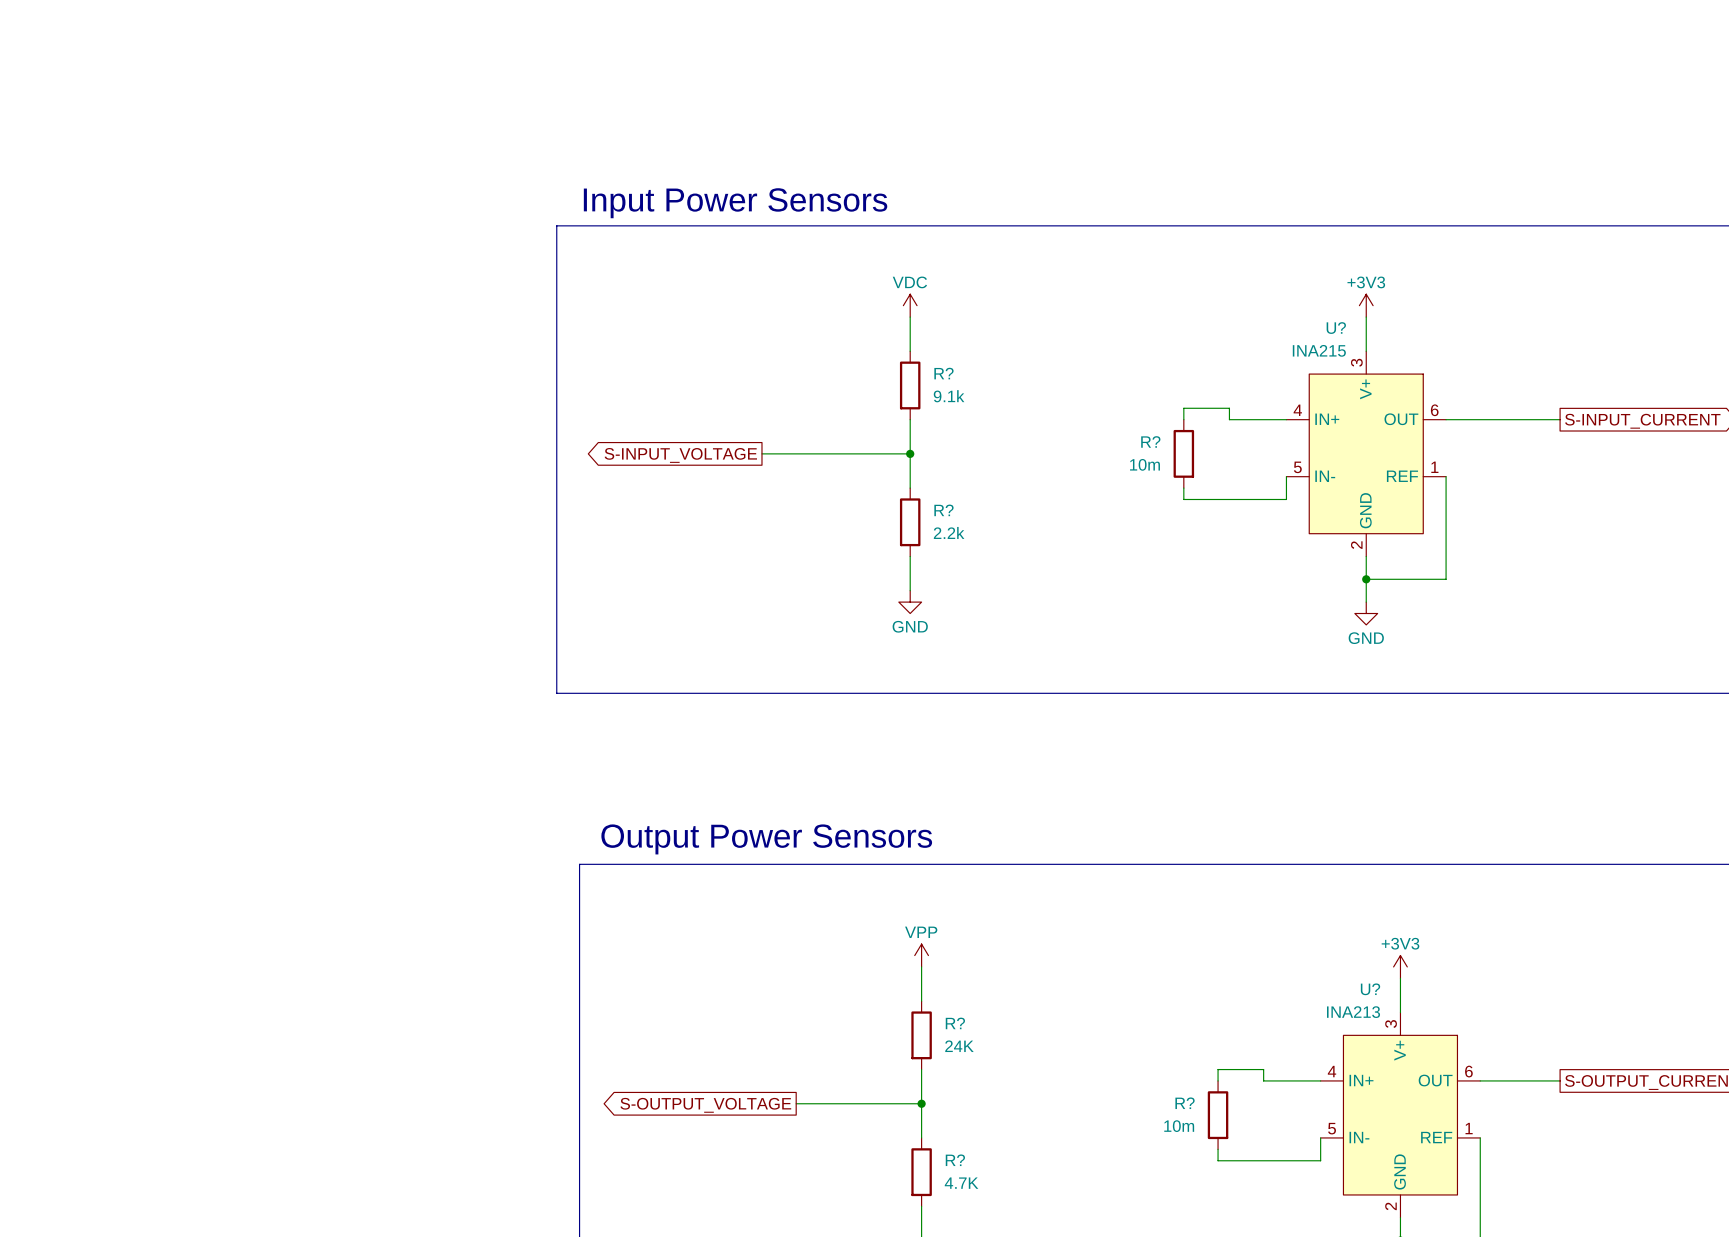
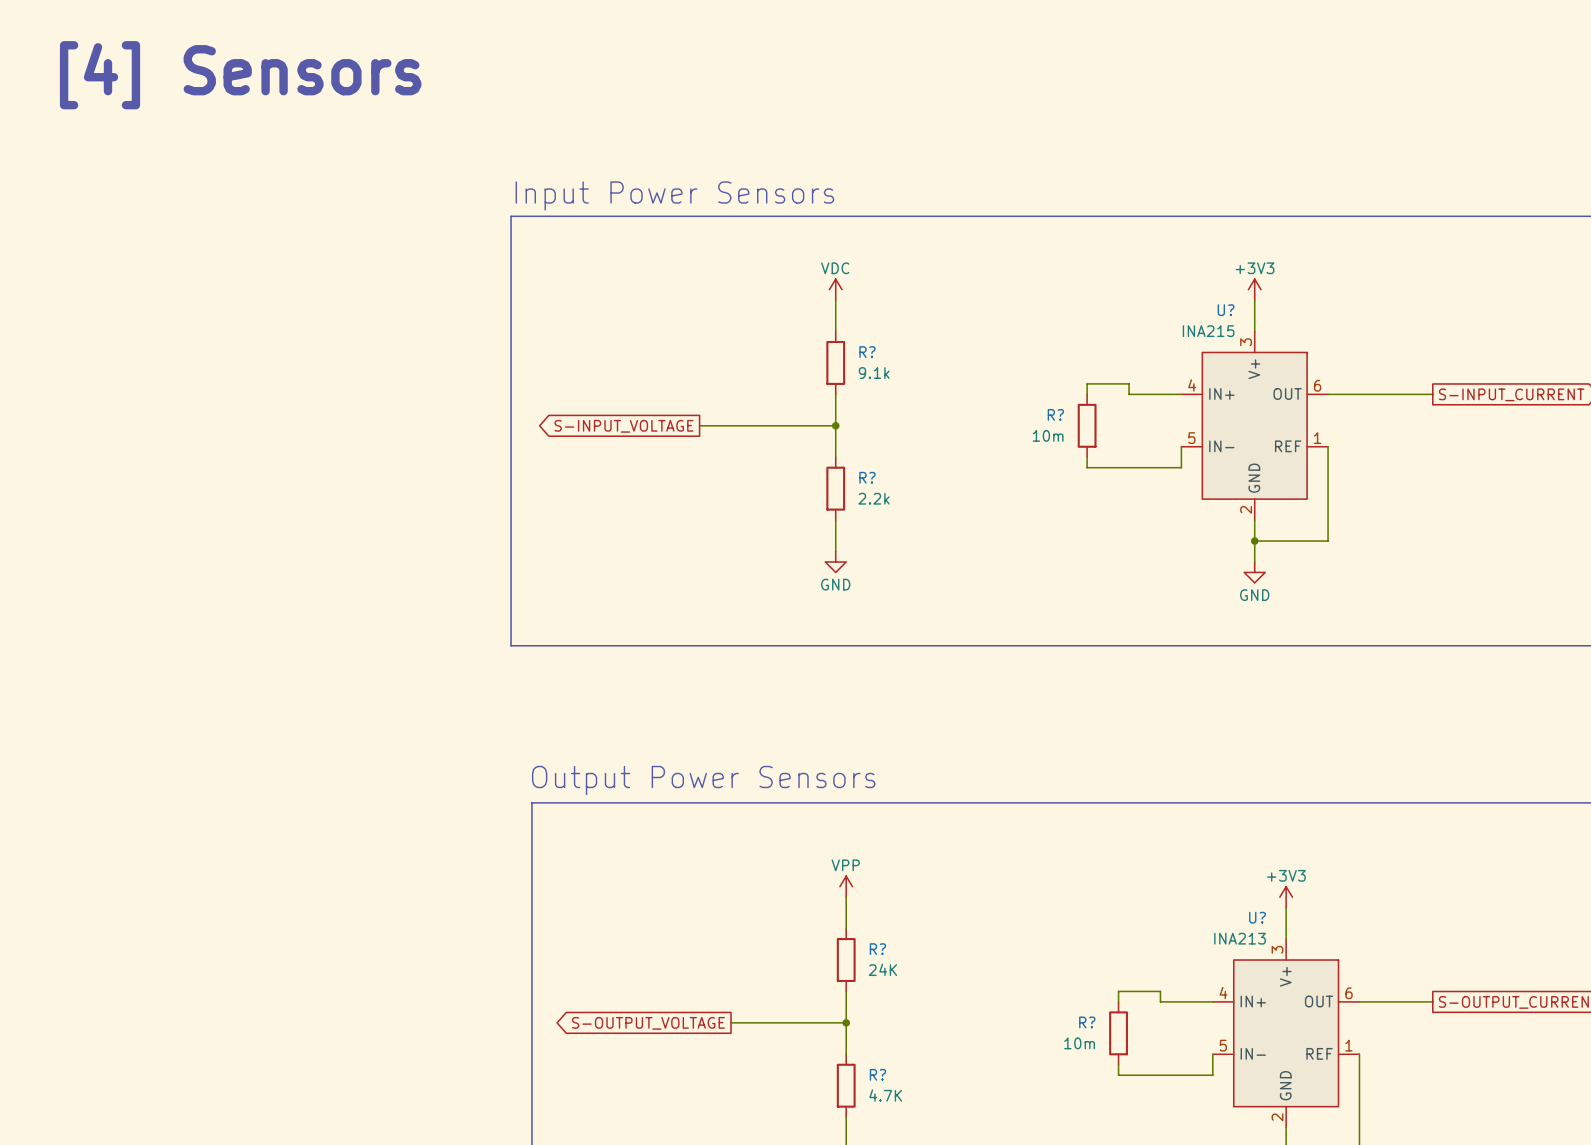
text: none -> [4] Sensors (240, 75)

